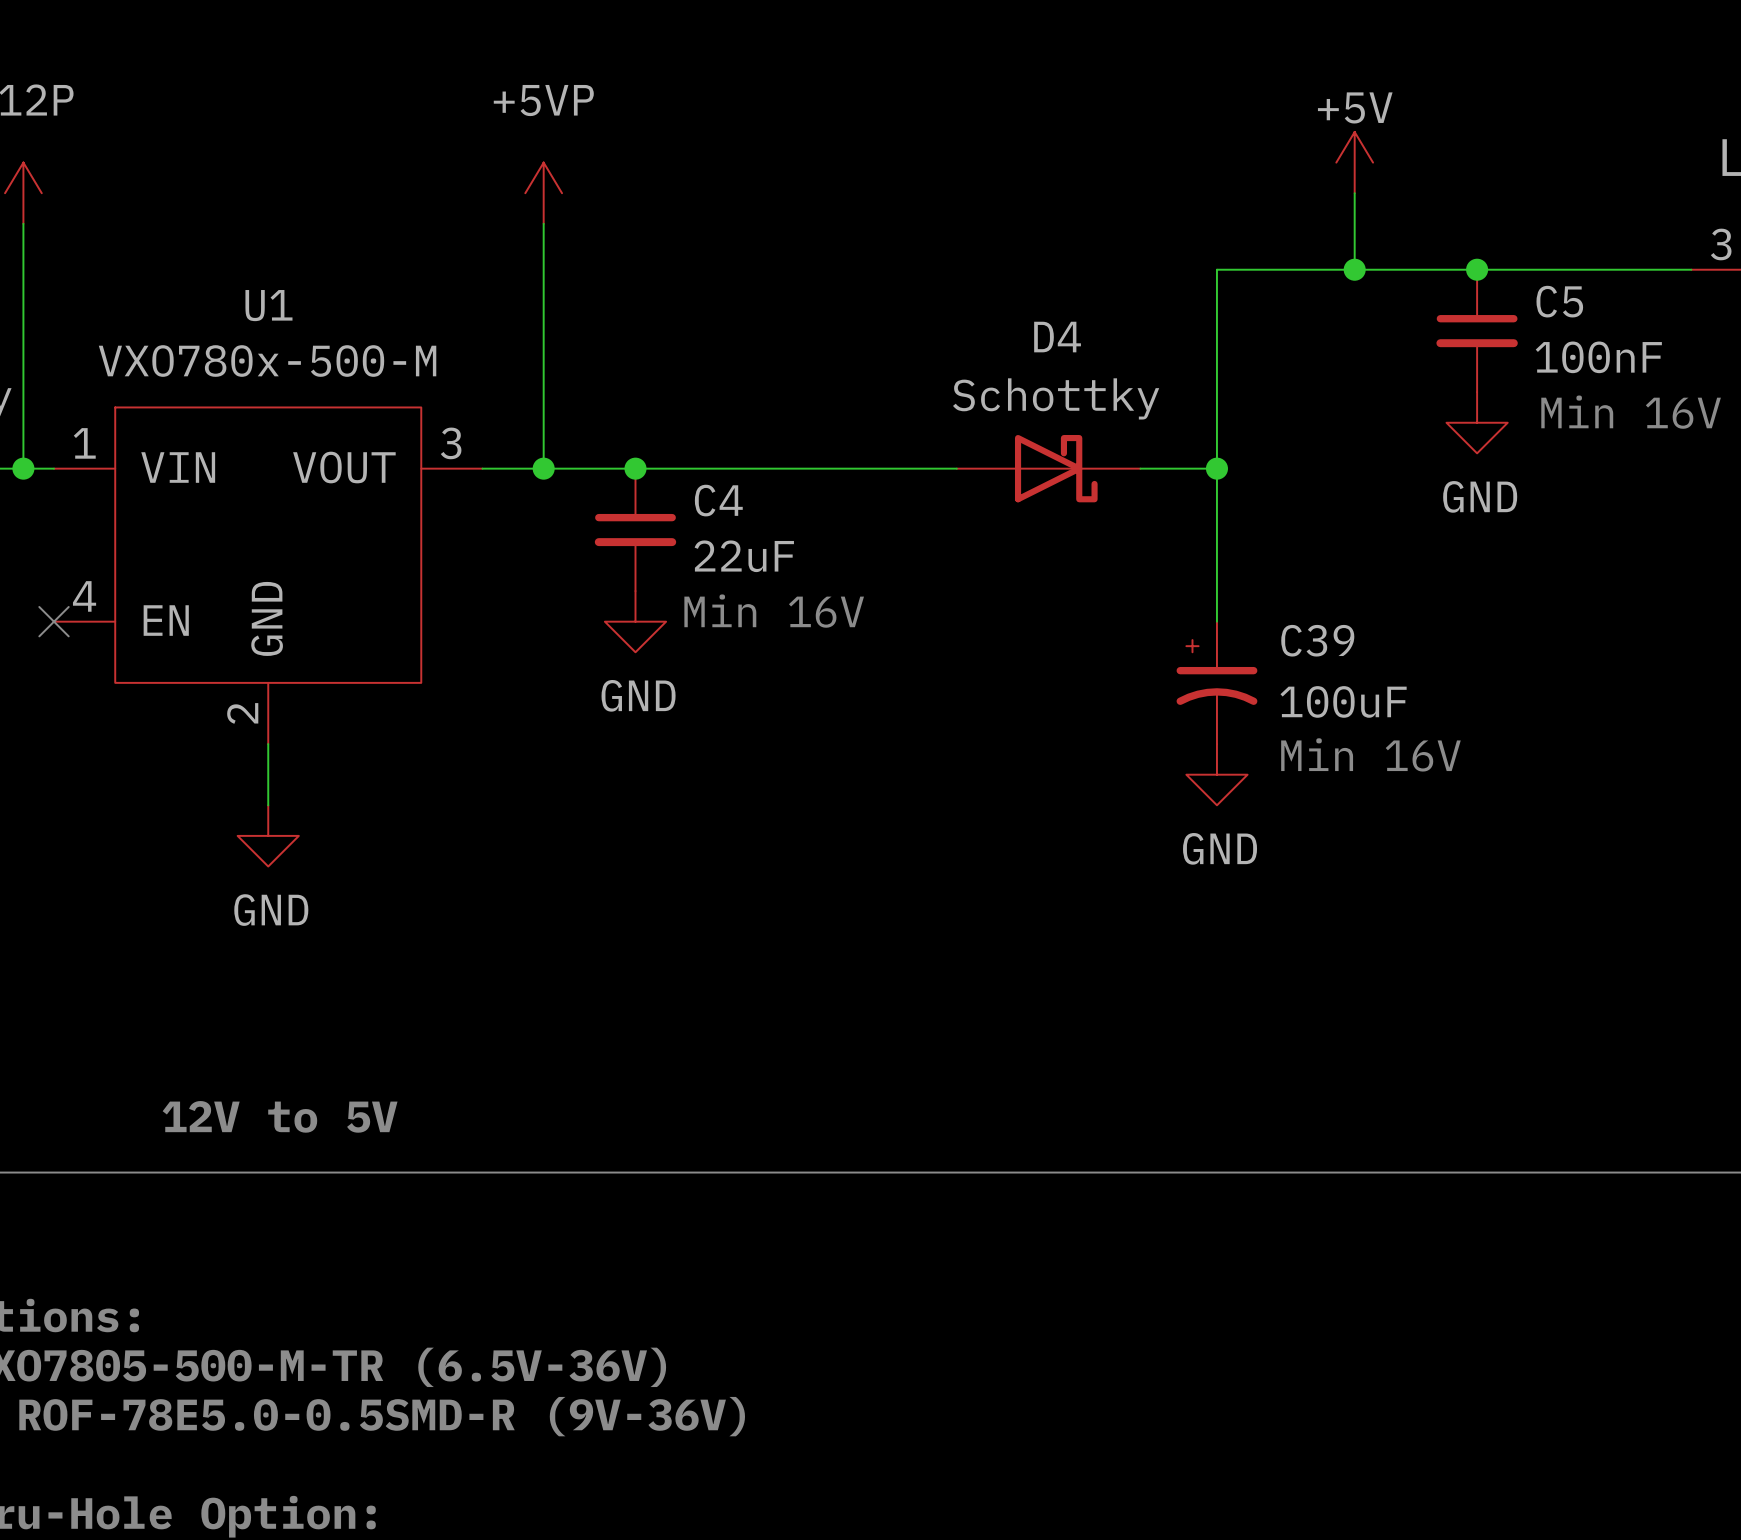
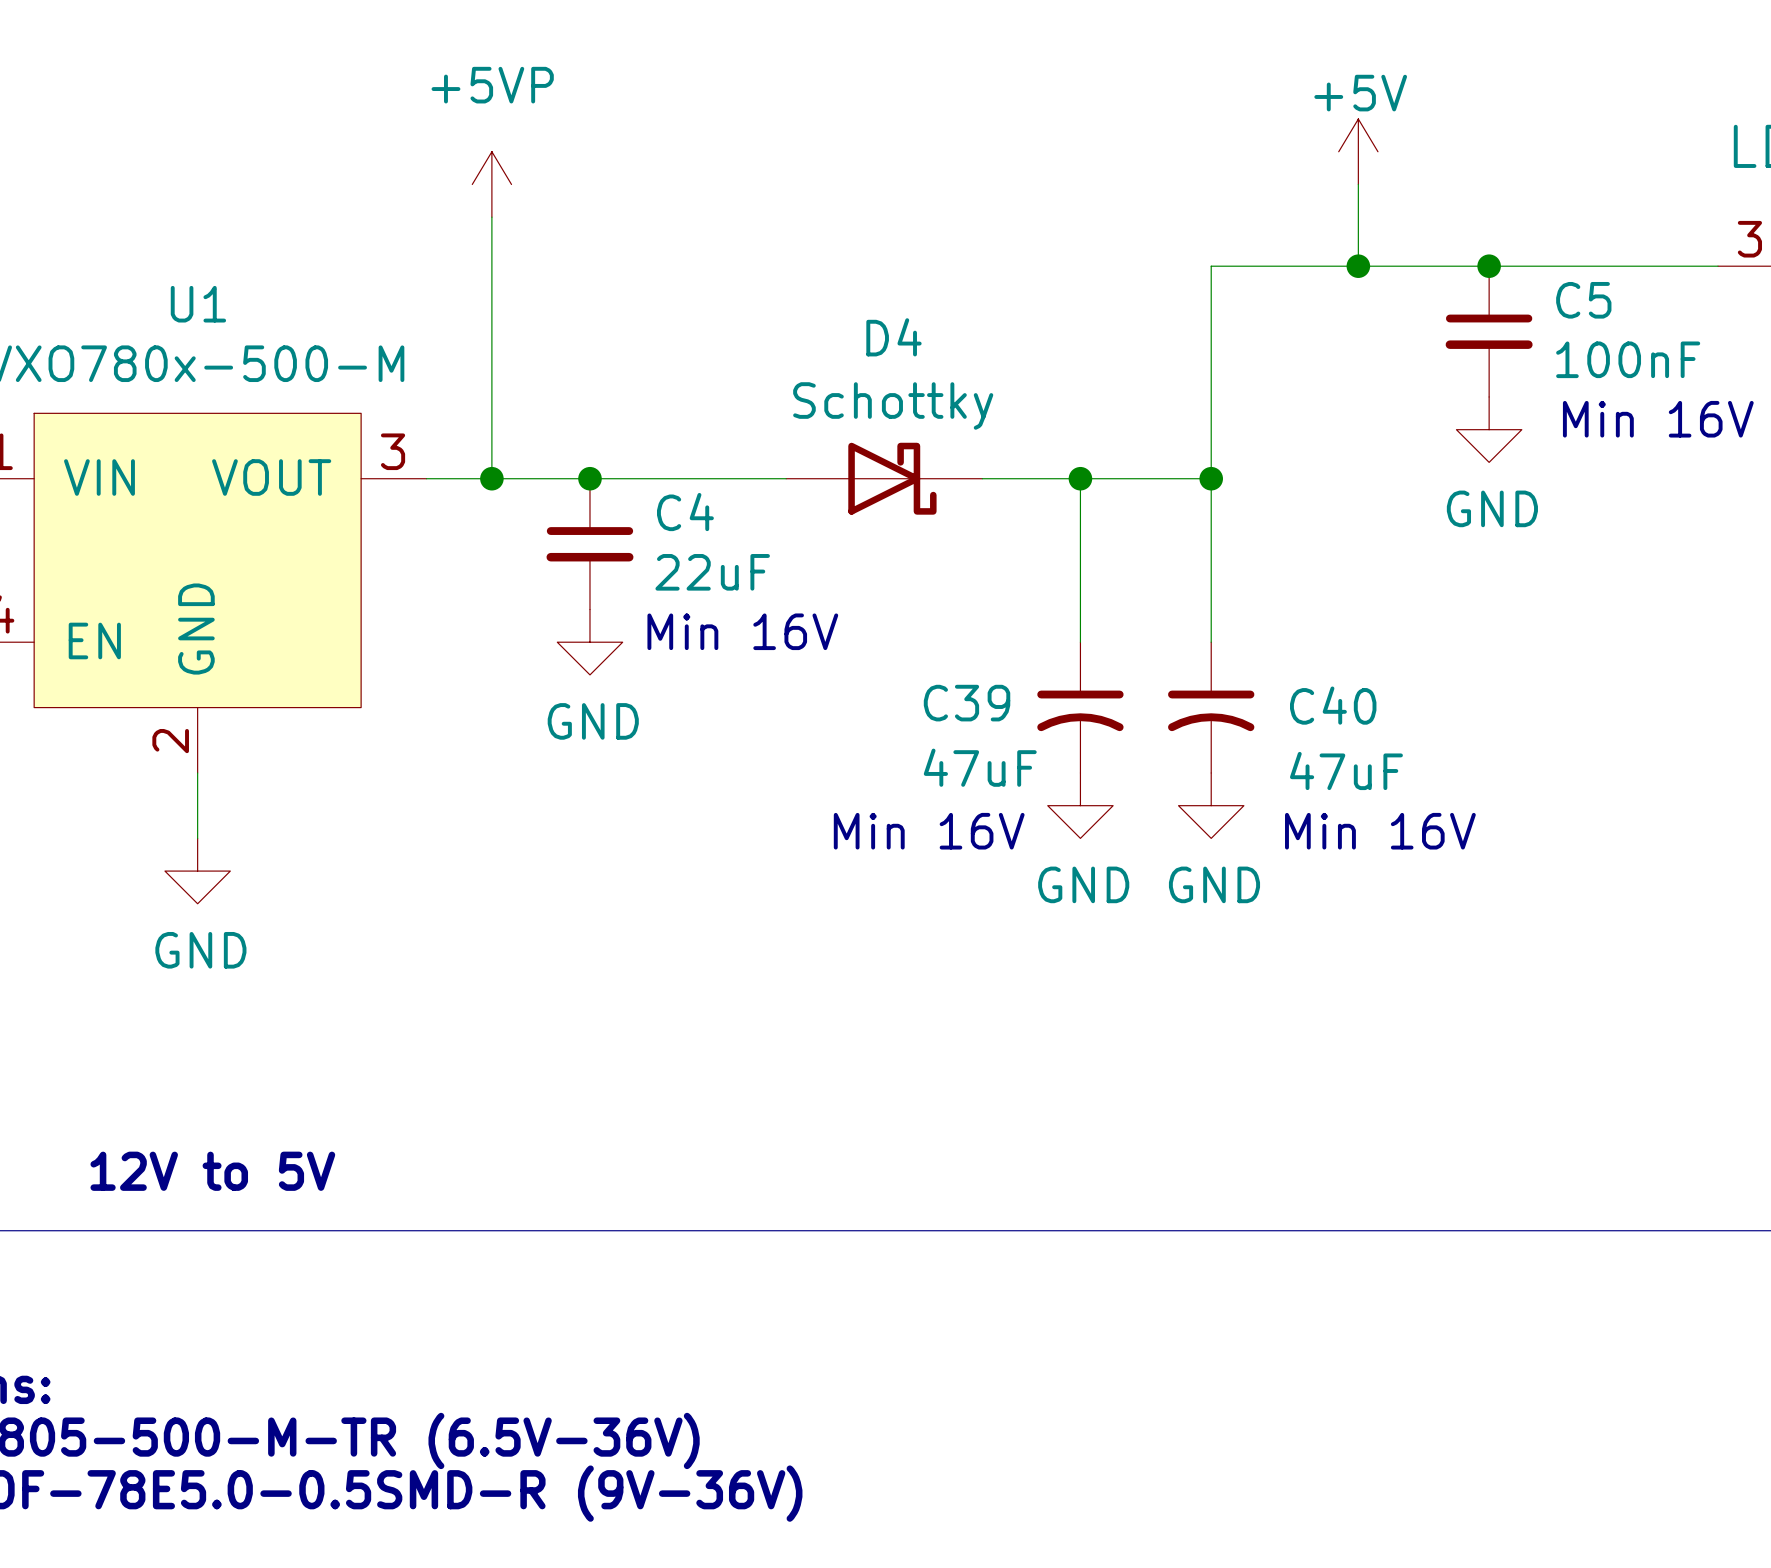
D4 position: (1048, 468) -> (884, 478)
wire: none -> (1080, 478) (1080, 642)
junction: none -> (1080, 478)
C39 symbol: [1176, 621, 1258, 745] -> [1037, 642, 1124, 773]
C39 name position: C39 (1317, 640) -> C39 (967, 703)
C40: none -> 47uF (1211, 707)
C39 value: 100uF (1343, 701) -> 47uF (980, 767)
text position: Min 16V (1370, 754) -> Min 16V (1380, 831)
power symbol: none -> GND (1080, 805)
text: none -> Min 16V (929, 831)

